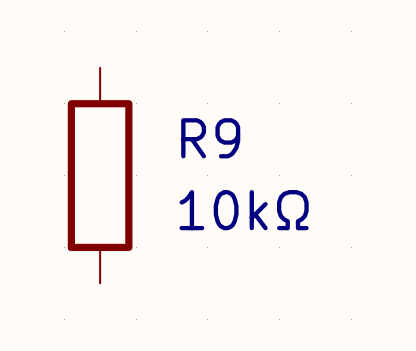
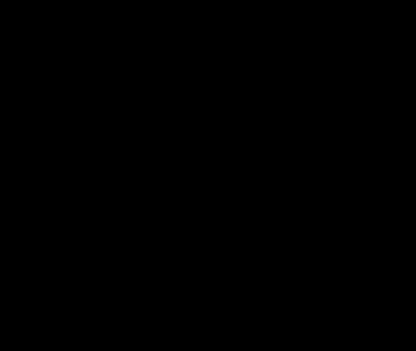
R9: 10kΩ (100, 175) -> none

